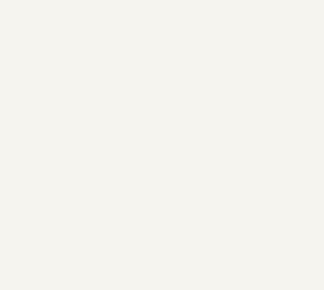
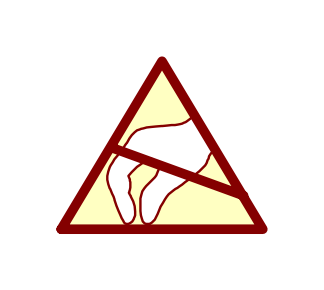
power symbol: none -> (162, 145)

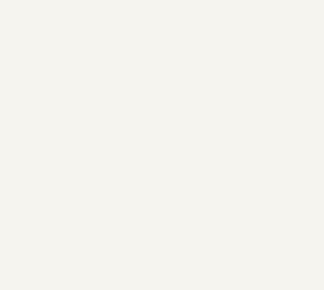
power symbol: (162, 145) -> none

